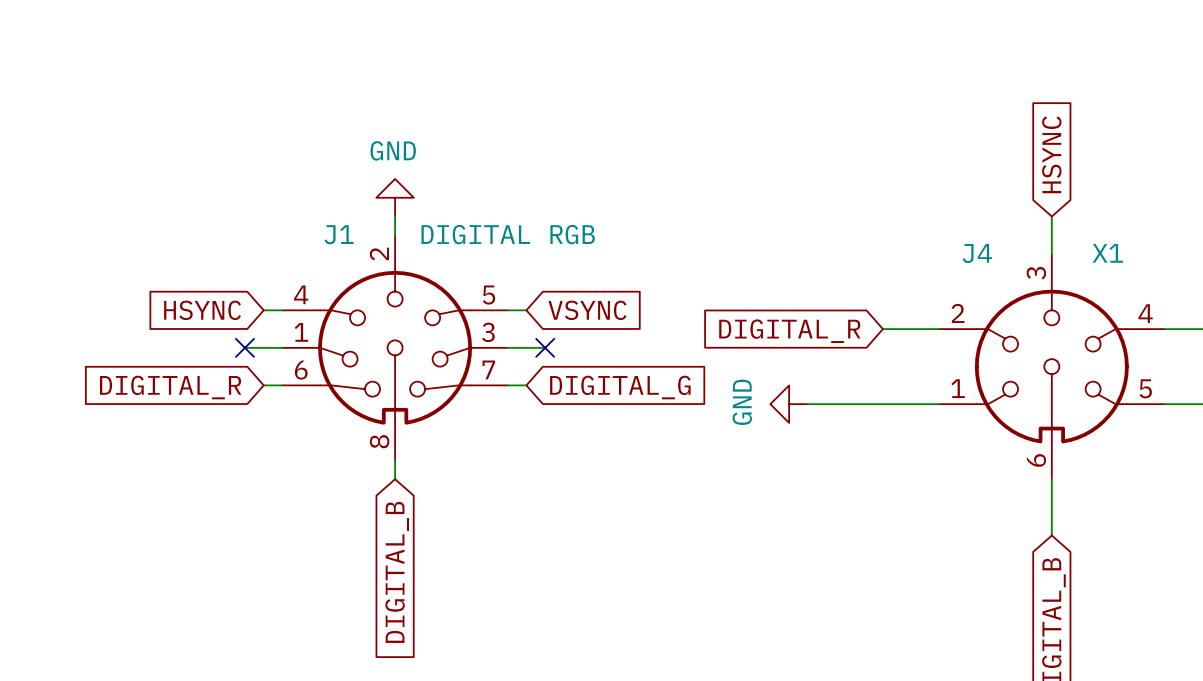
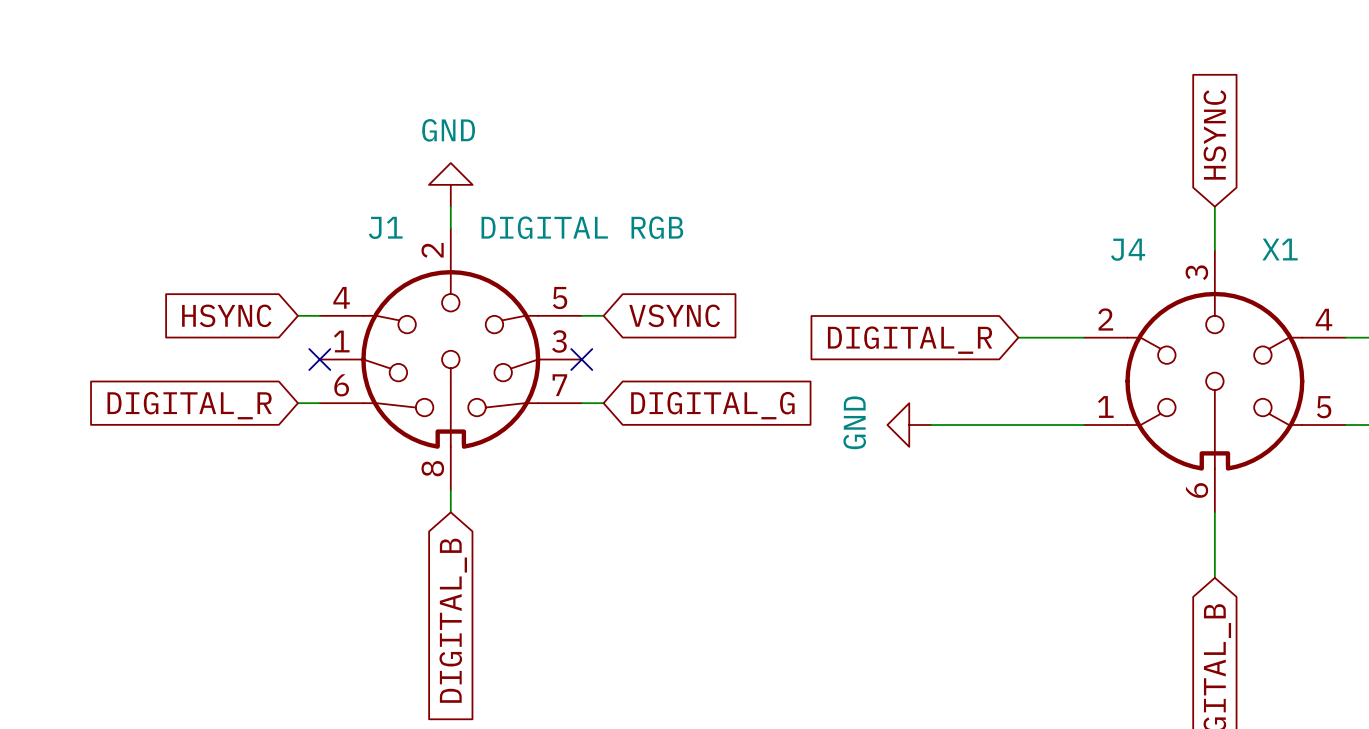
wire: (244, 347) (282, 347) -> none
no-connect mark position: (244, 347) -> (319, 359)
wire: (507, 347) (545, 347) -> none
no-connect mark position: (545, 347) -> (581, 359)

